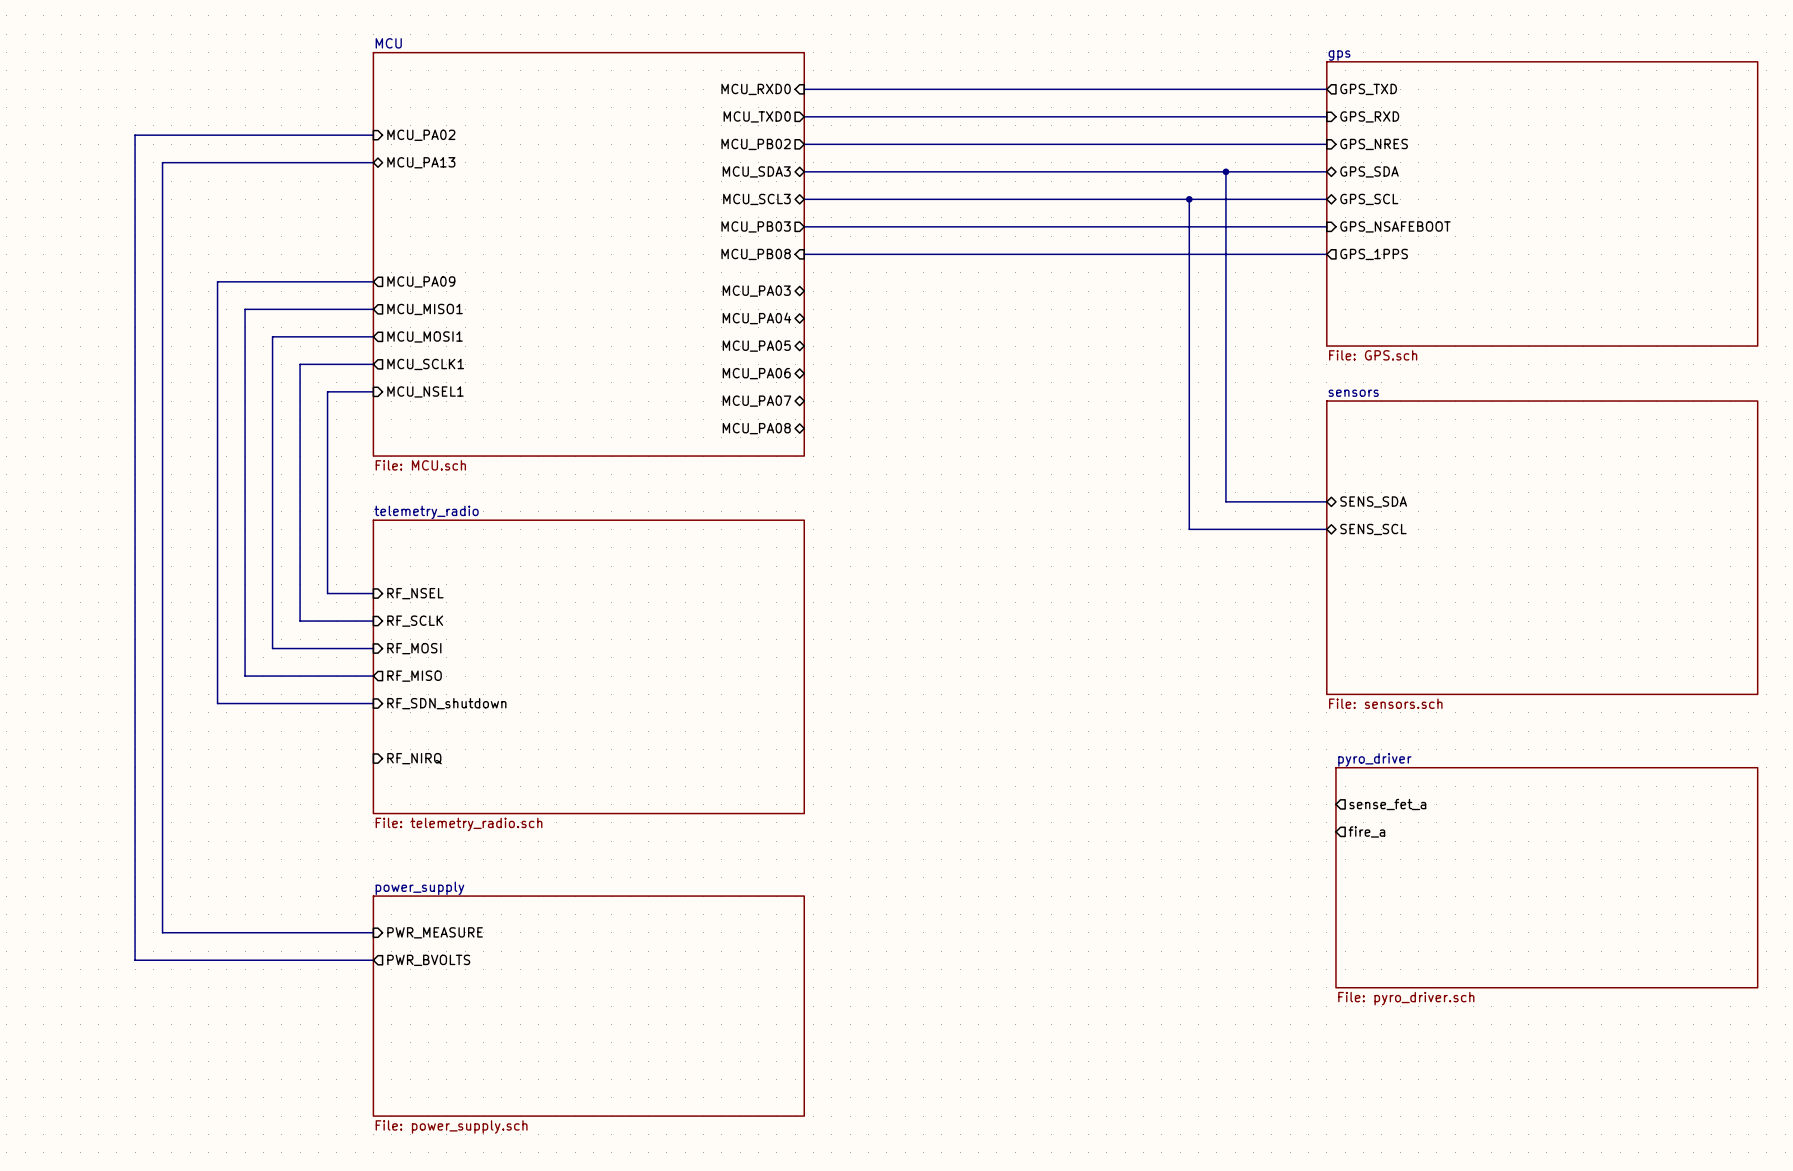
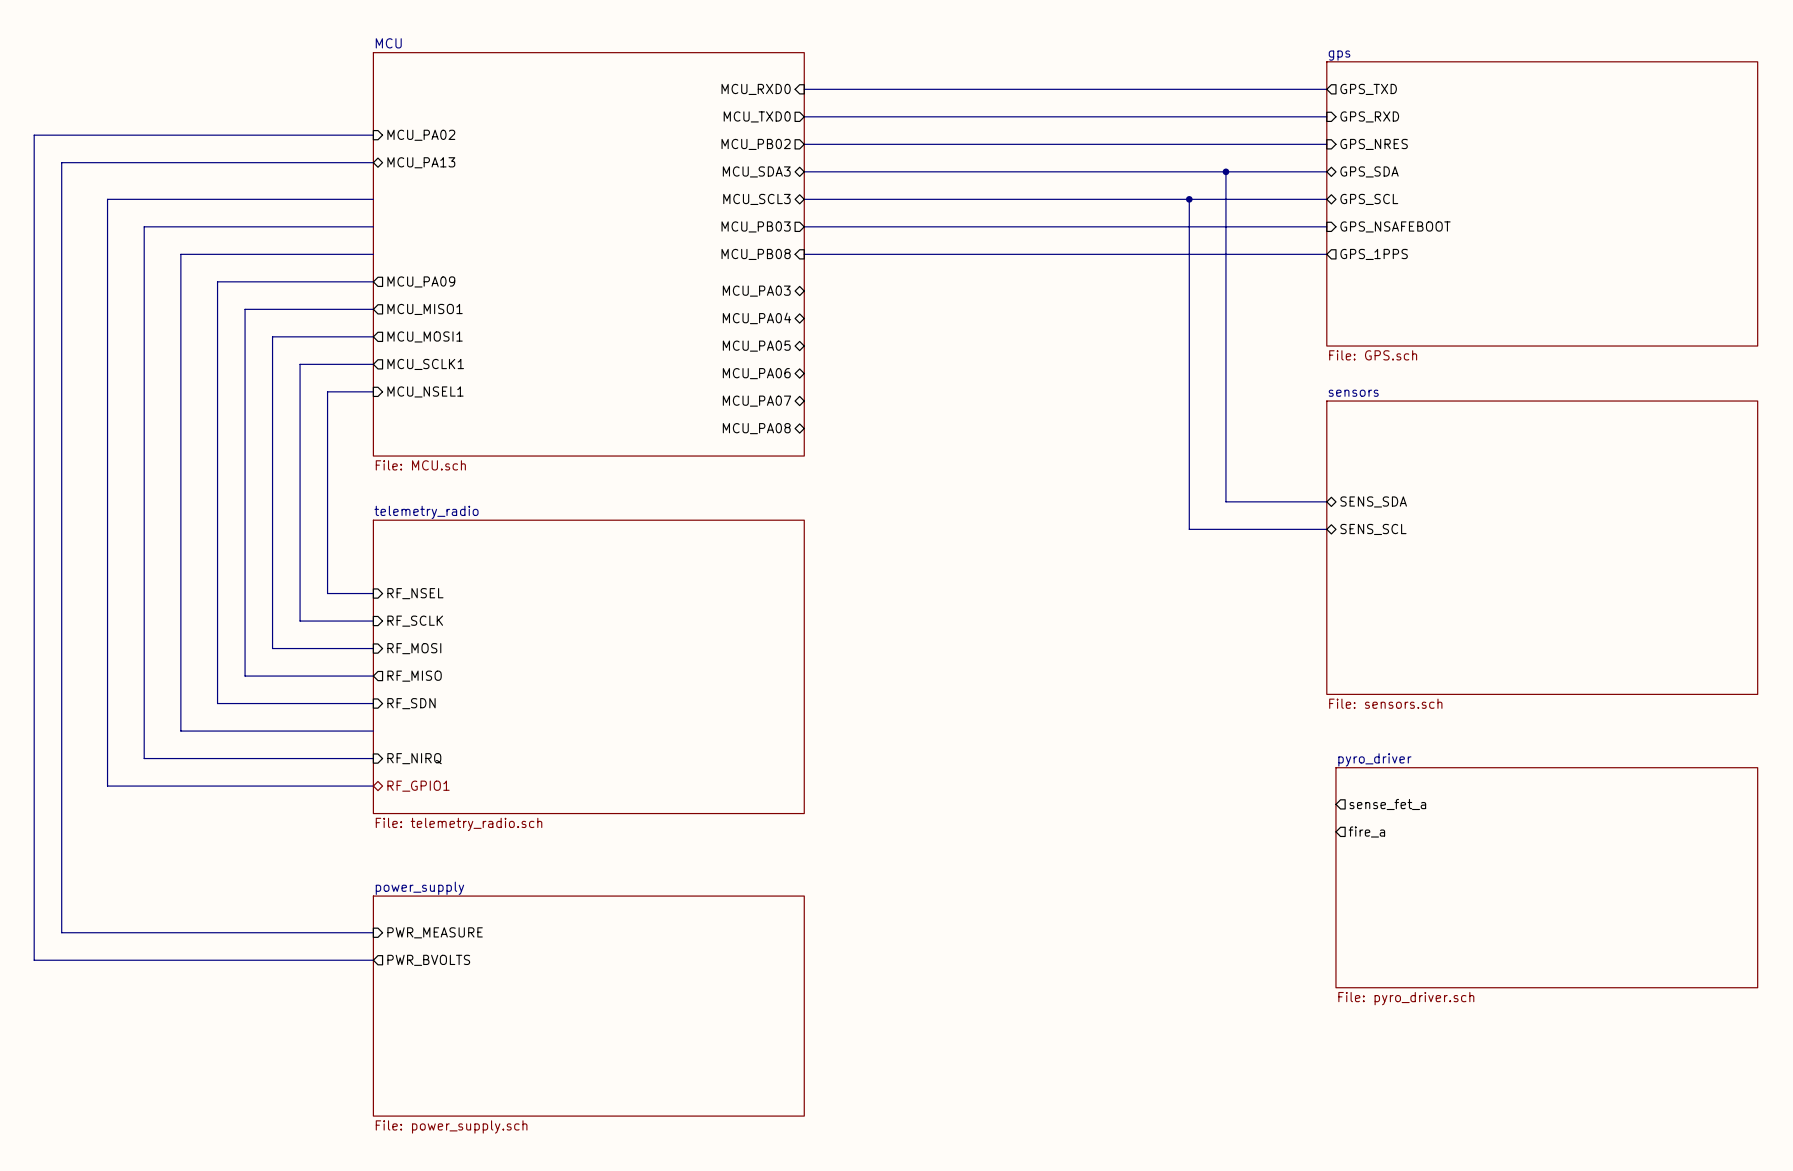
wire: (135, 135) (135, 960) -> (135, 135) (34, 135) (34, 960) (135, 960)
wire: (162, 162) (162, 932) -> (162, 162) (61, 162) (61, 932) (162, 932)
wire: none -> (373, 199) (107, 199) (107, 786) (373, 786)
wire: none -> (373, 226) (144, 226) (144, 758) (373, 758)
wire: none -> (373, 254) (180, 254) (180, 731) (373, 731)
sheet pin: RF_SDN_shutdown (446, 703) -> RF_SDN (411, 703)
hierarchical label: none -> RF_GPIO1 (418, 786)

